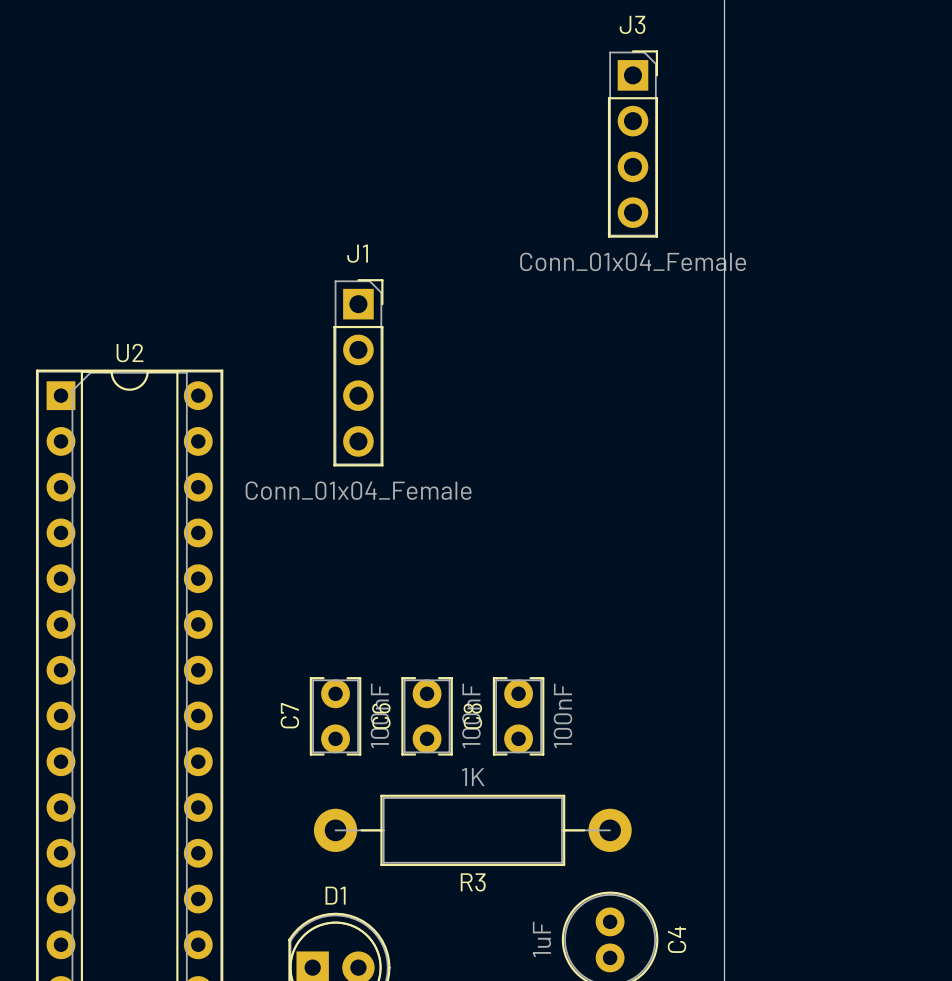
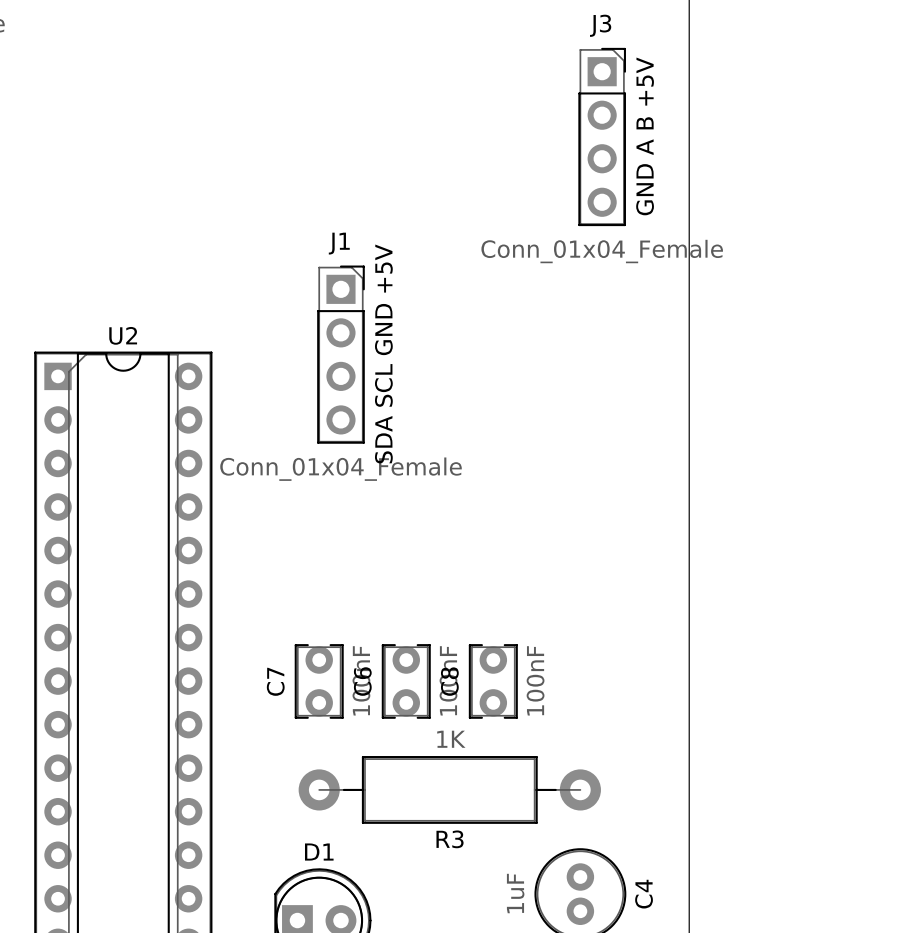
text: none -> GND A B +5V (645, 136)
text: none -> SDA SCL GND +5V (383, 353)

